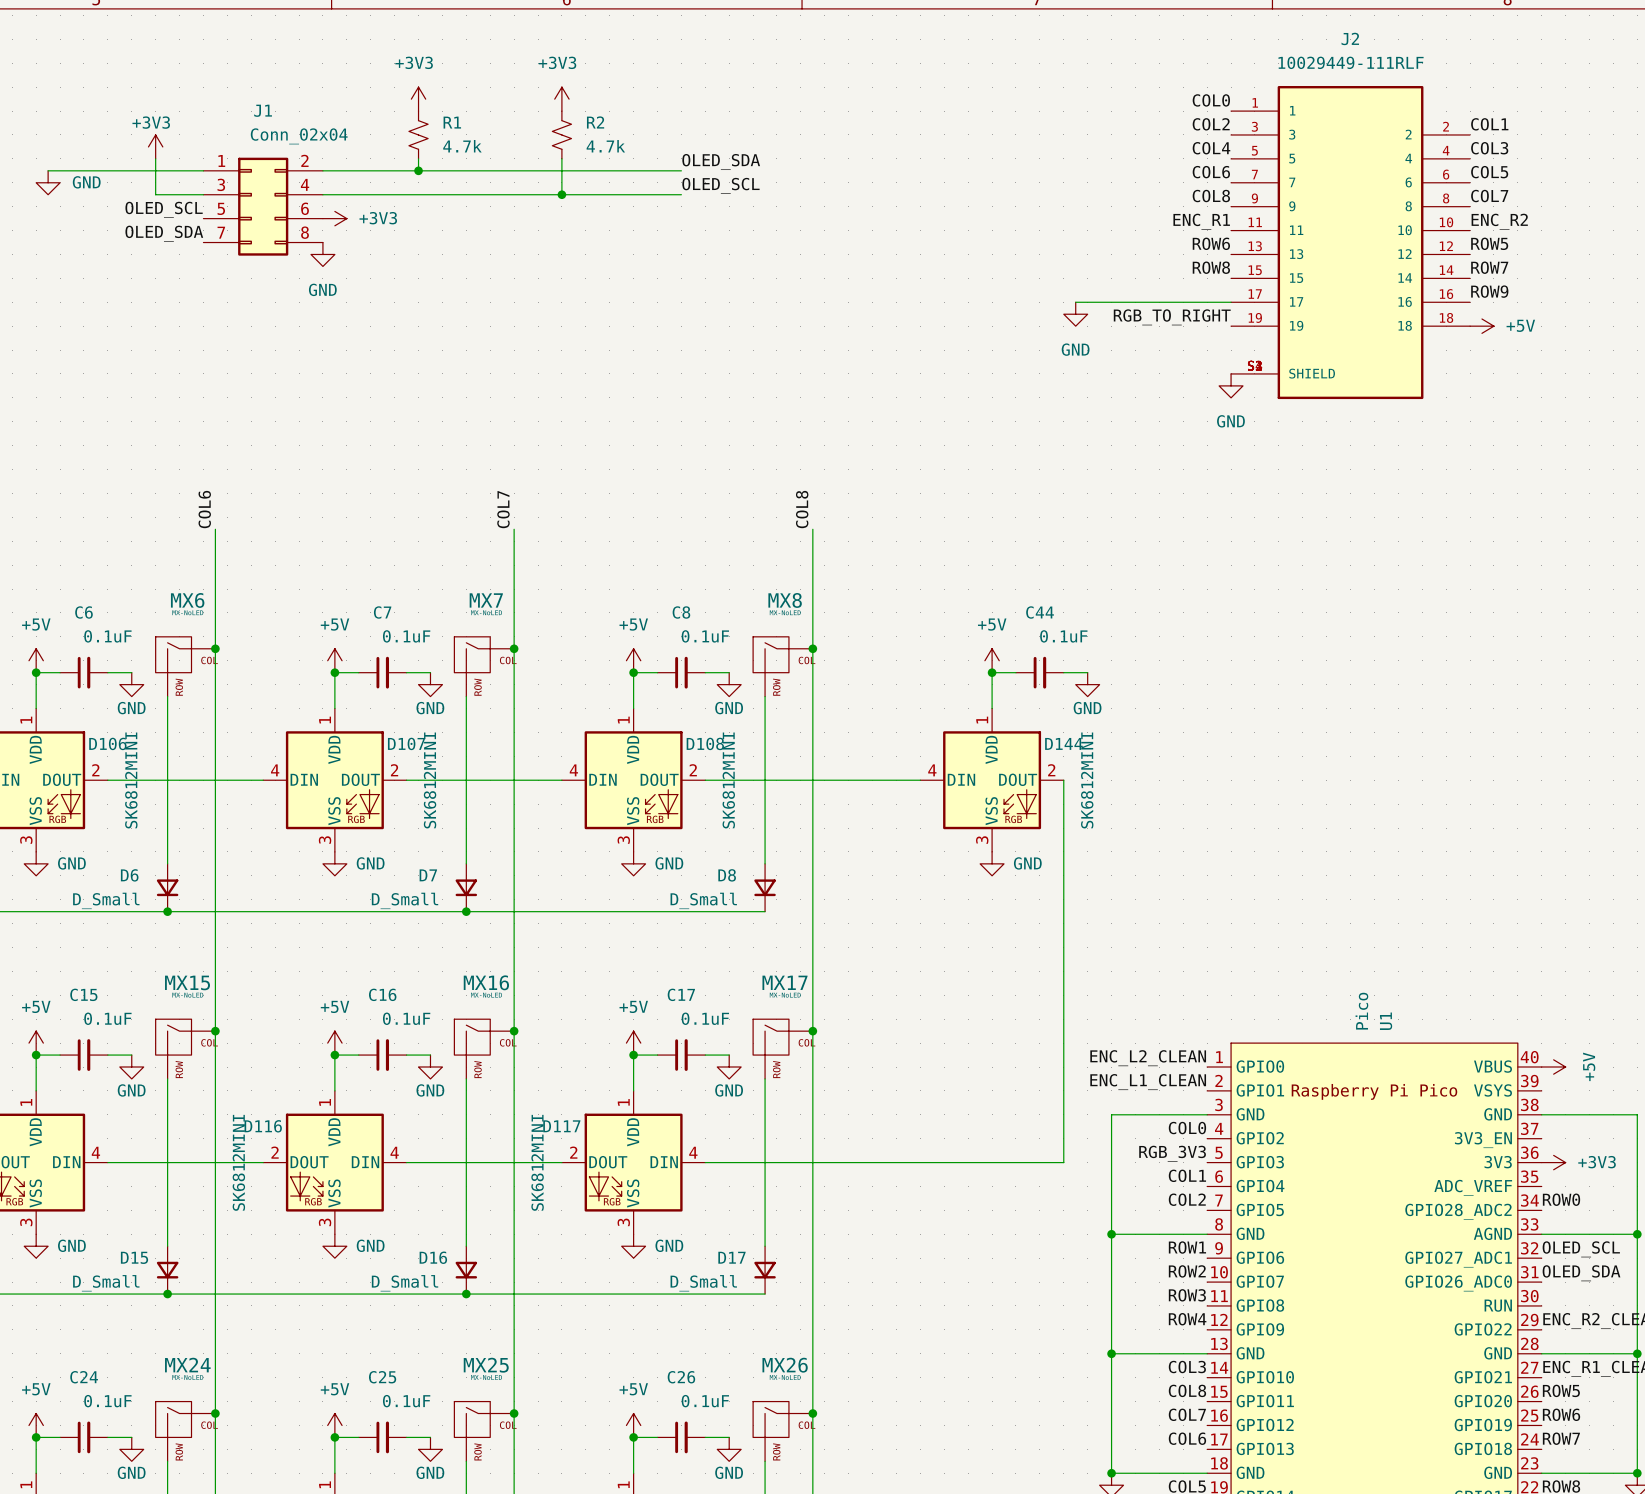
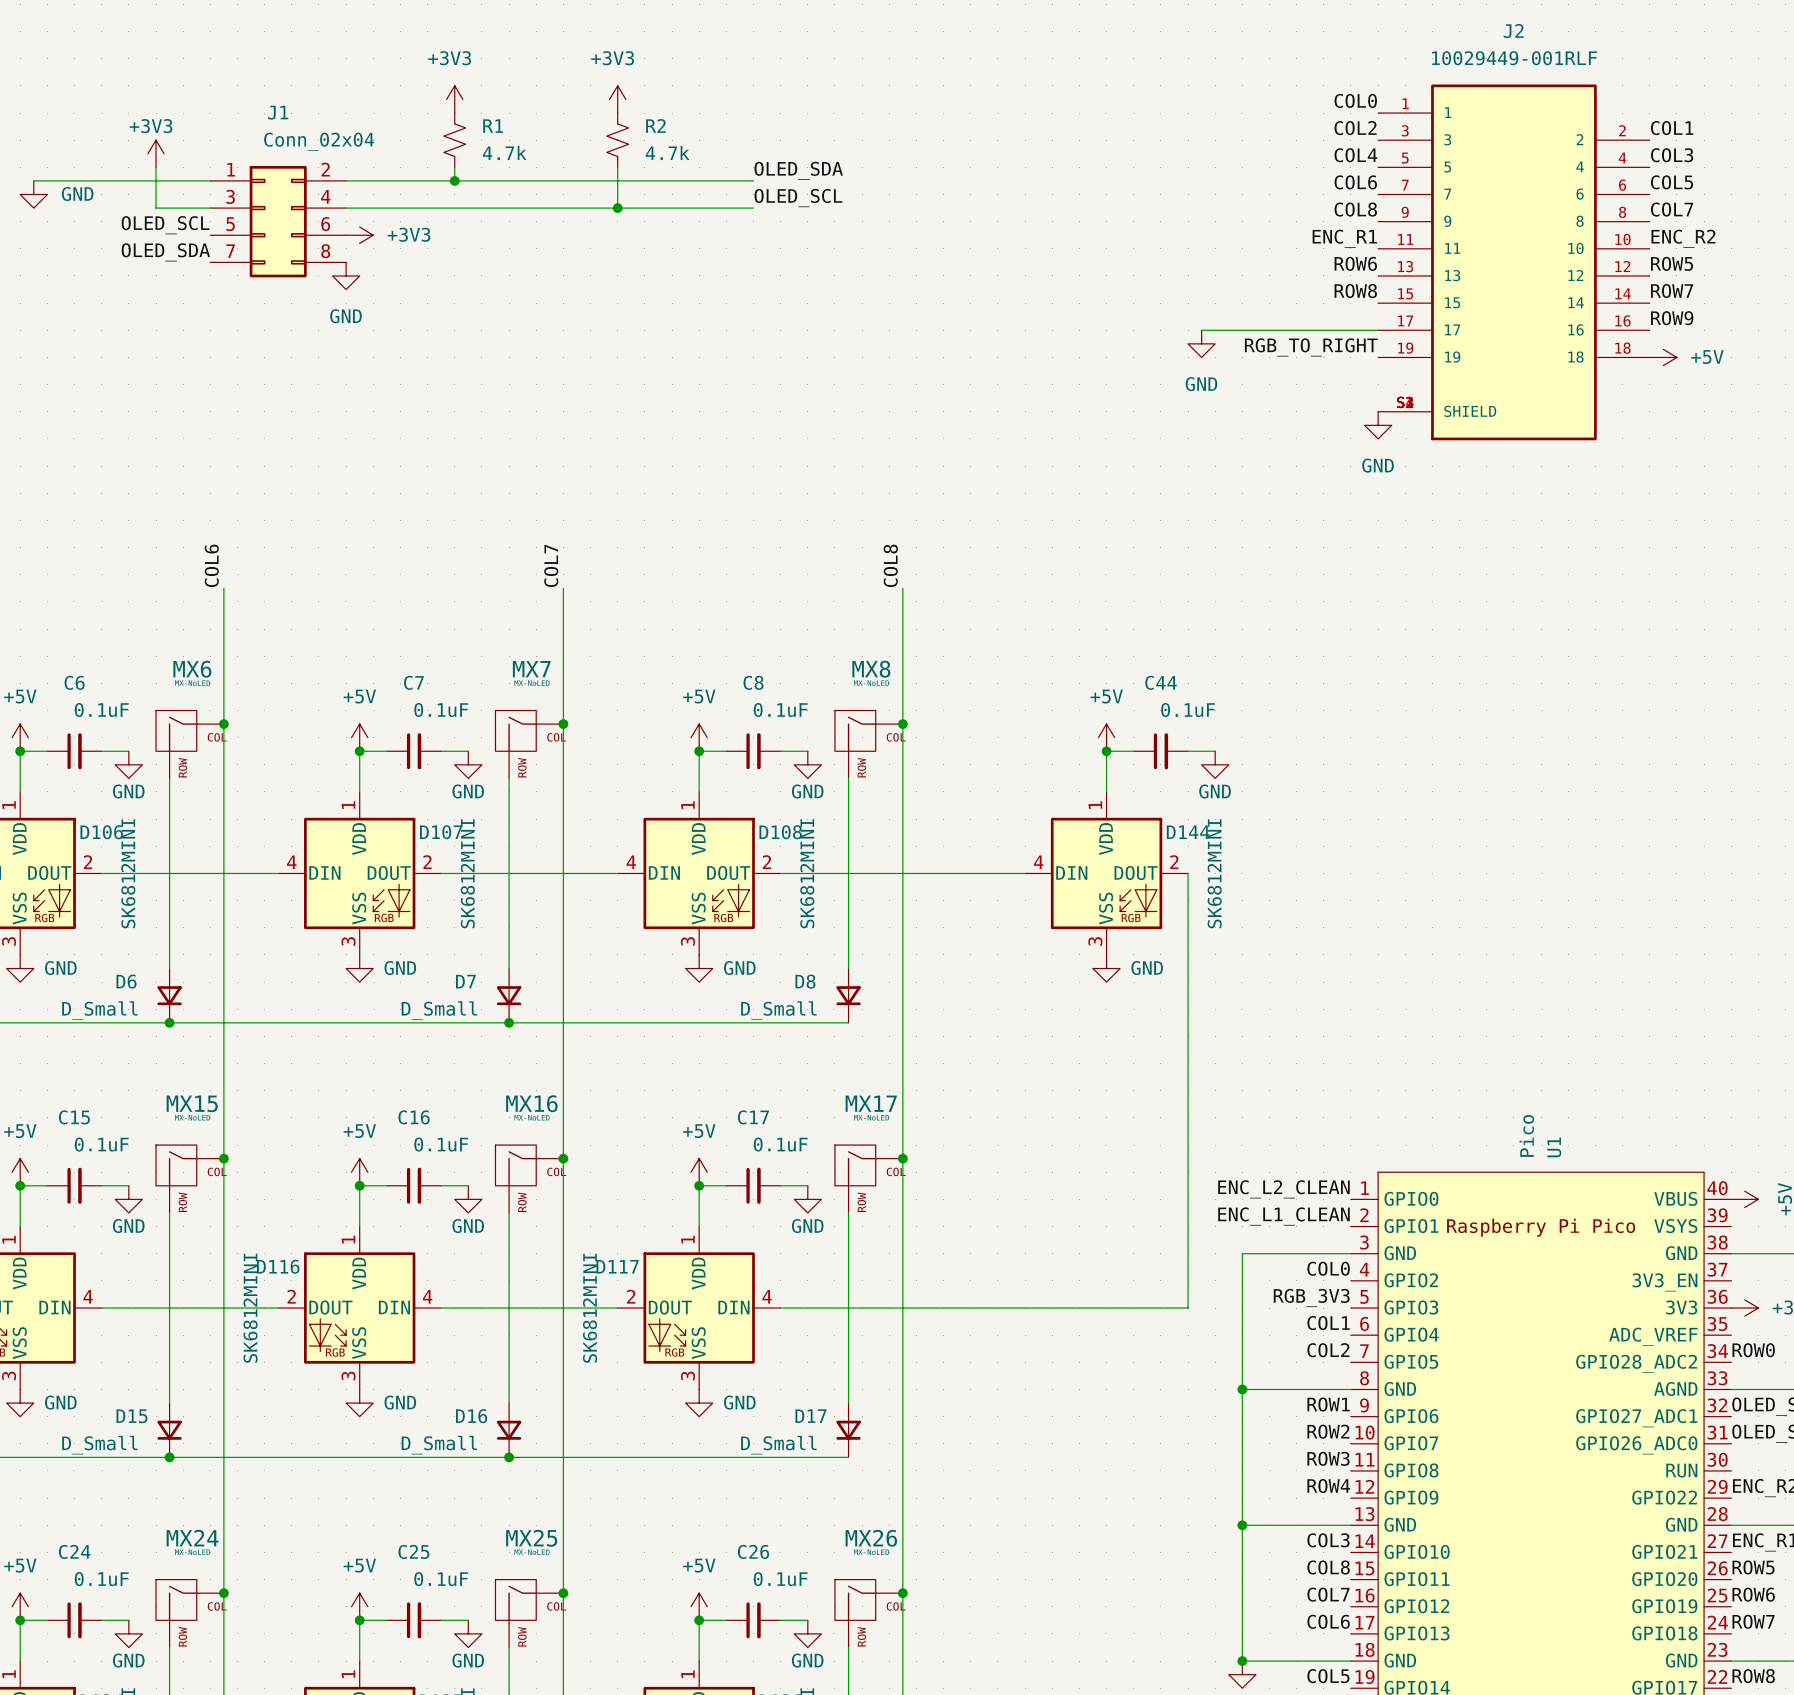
J2 value: 10029449-111RLF (1351, 62) -> 10029449-001RLF (1514, 58)

